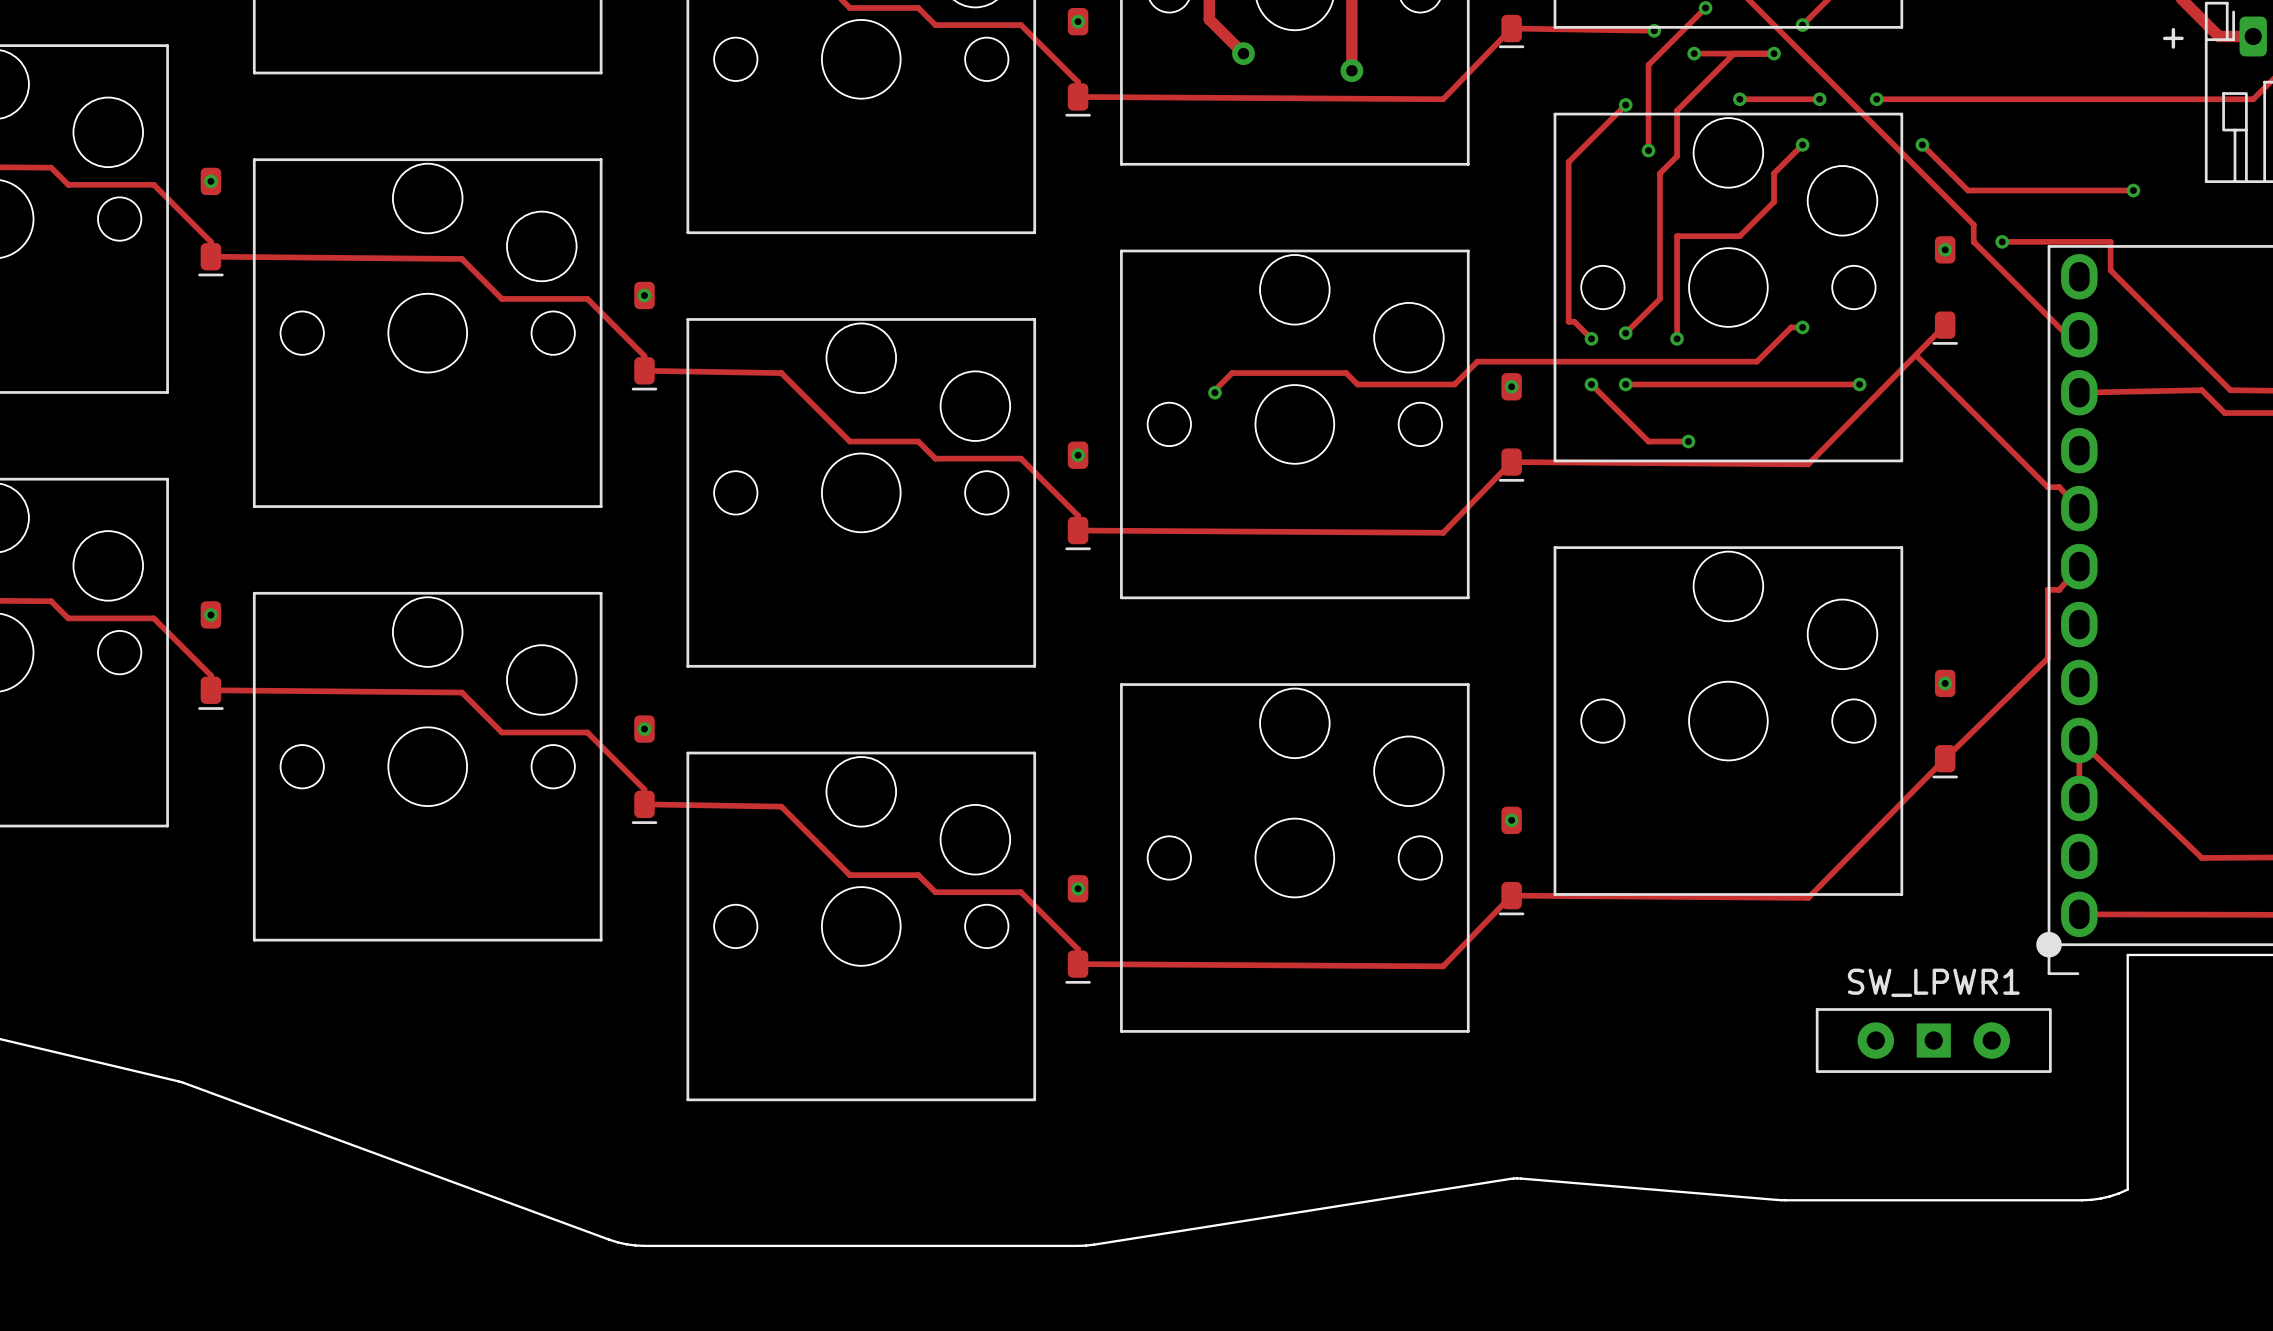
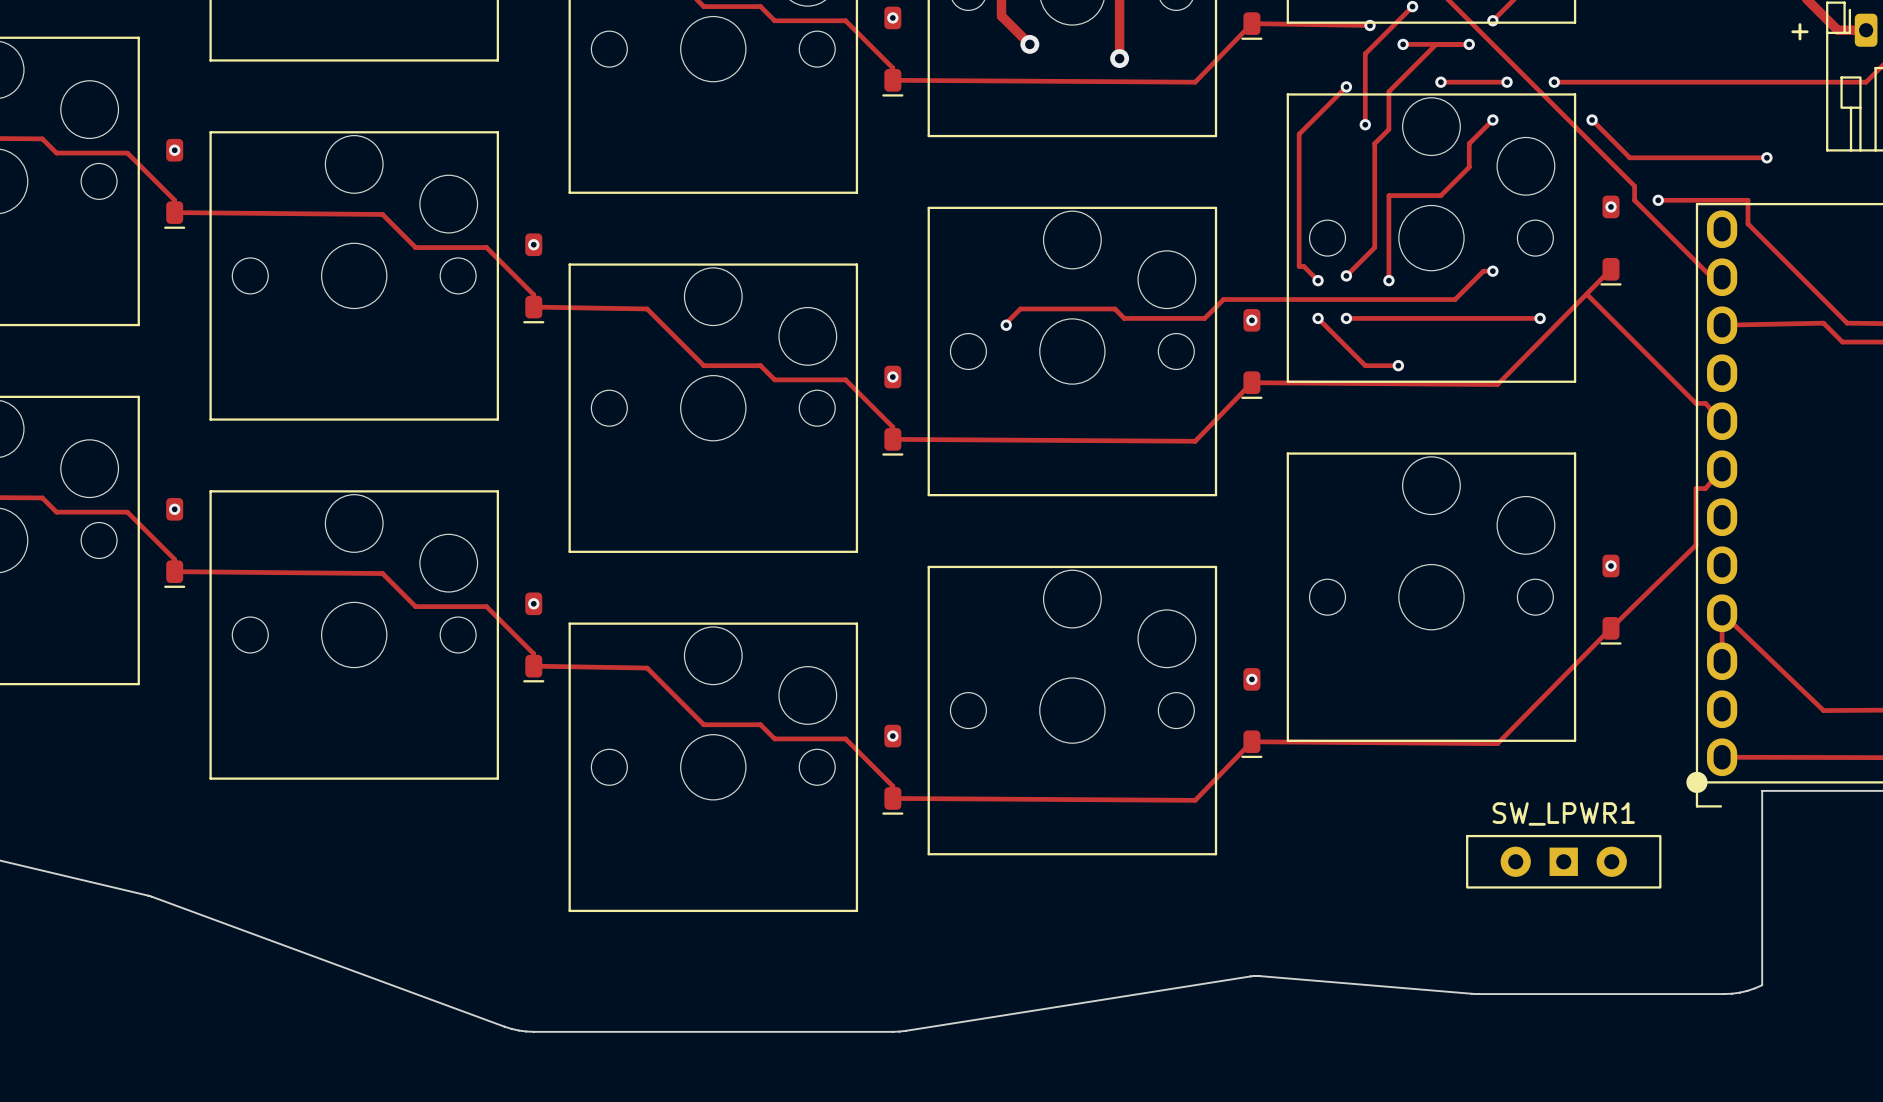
SW_LPWR1 position: (1933, 1040) -> (1563, 861)

